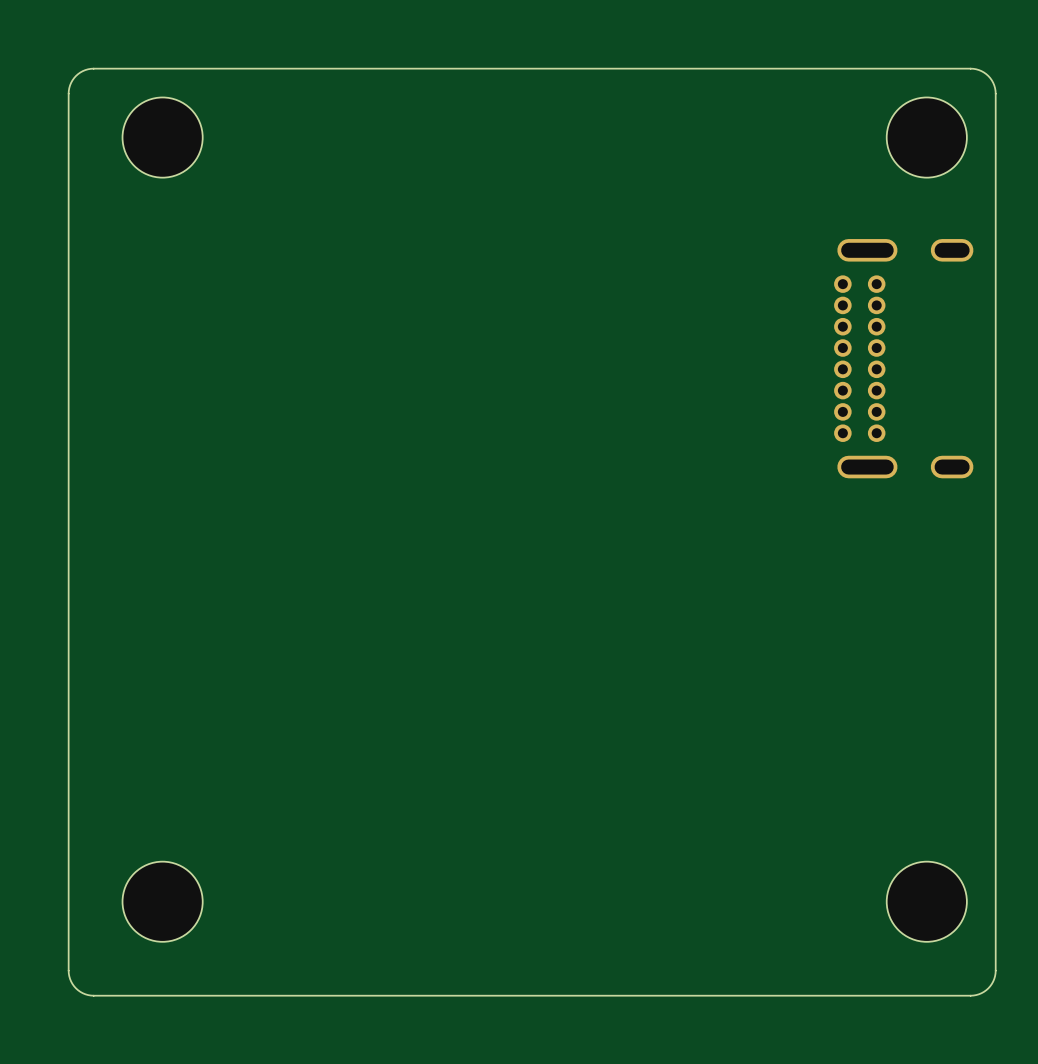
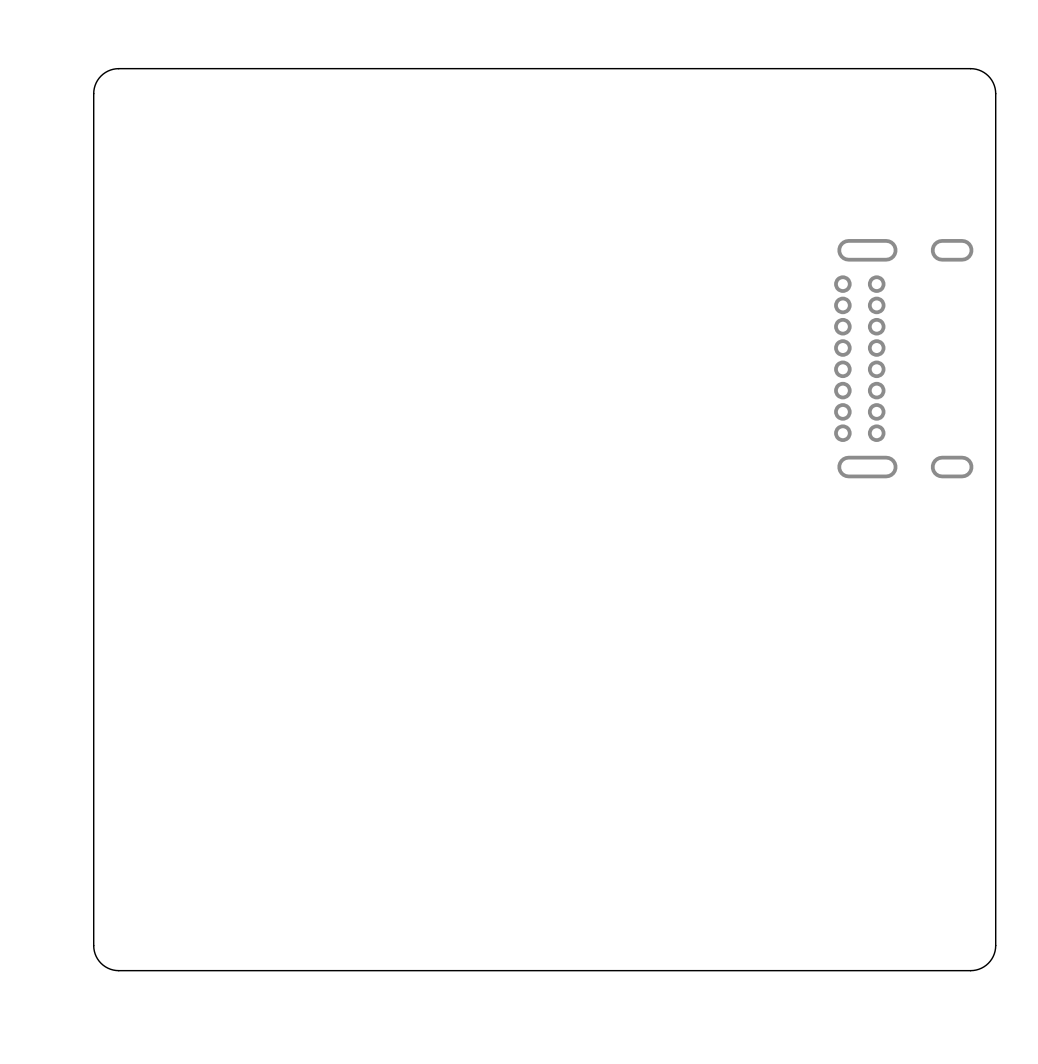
board edge: (118, 68) (90, 68) (82, 71) (72, 80) (68, 93) (68, 970) (71, 981) (75, 988) (85, 994) (93, 995) (970, 995) (983, 991) (993, 981) (995, 973) (995, 945) -> (118, 68) (107, 71) (101, 75) (96, 82) (93, 93) (93, 945) (96, 956) (101, 963) (107, 968) (118, 970) (970, 970) (981, 968) (988, 963) (994, 953) (995, 945)
part: (162, 137) -> none
part: (926, 137) -> none
part: (162, 901) -> none
part: (926, 901) -> none

